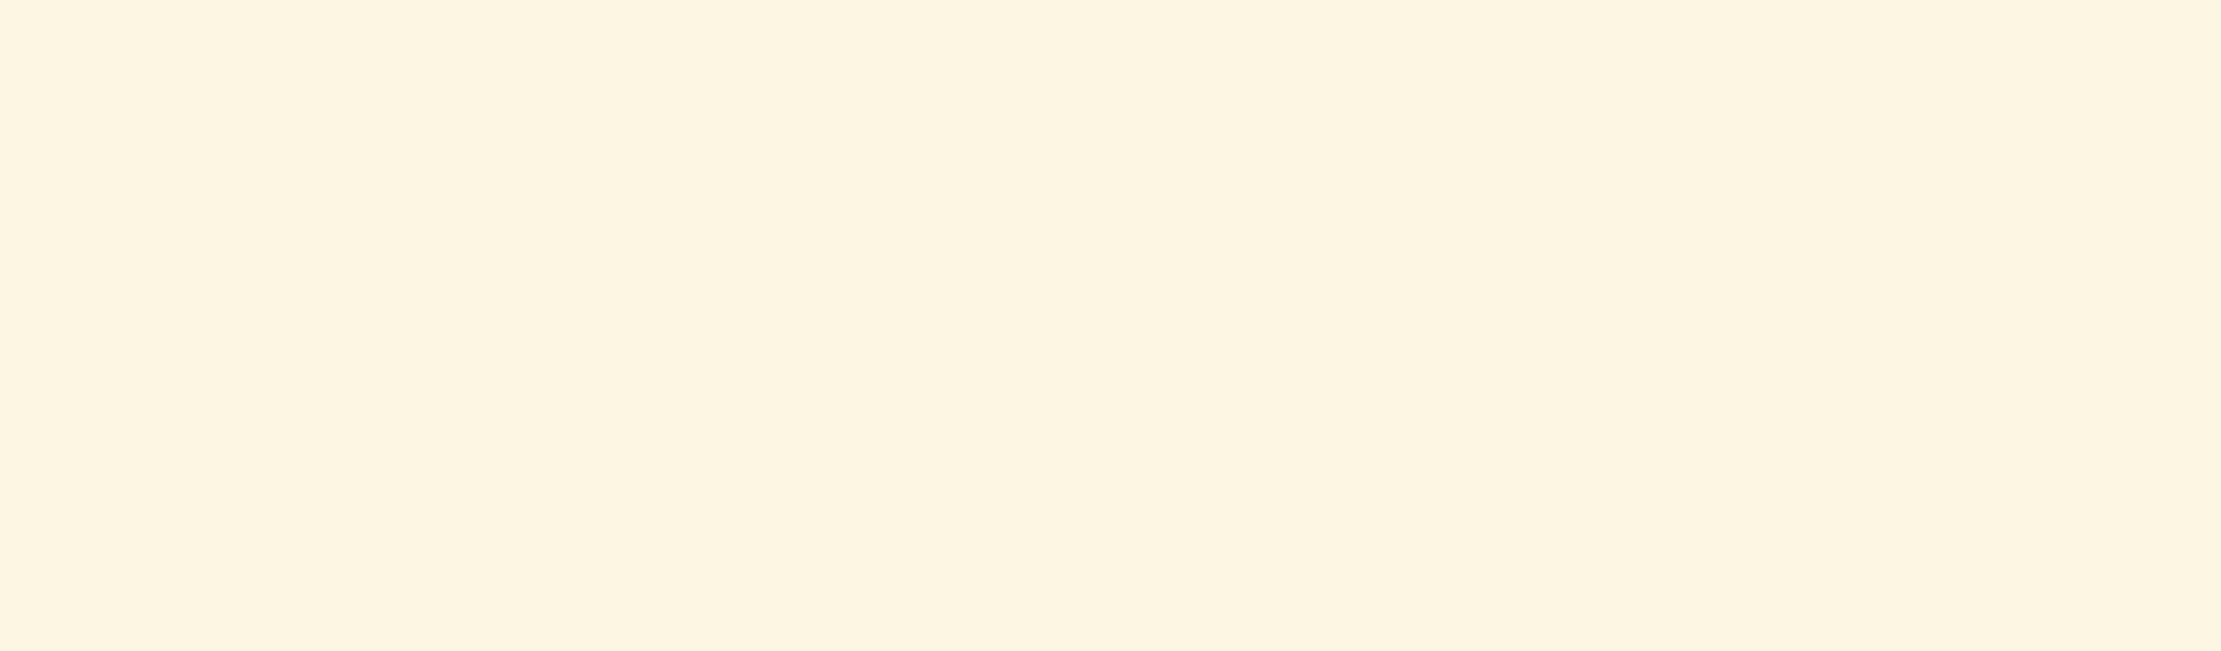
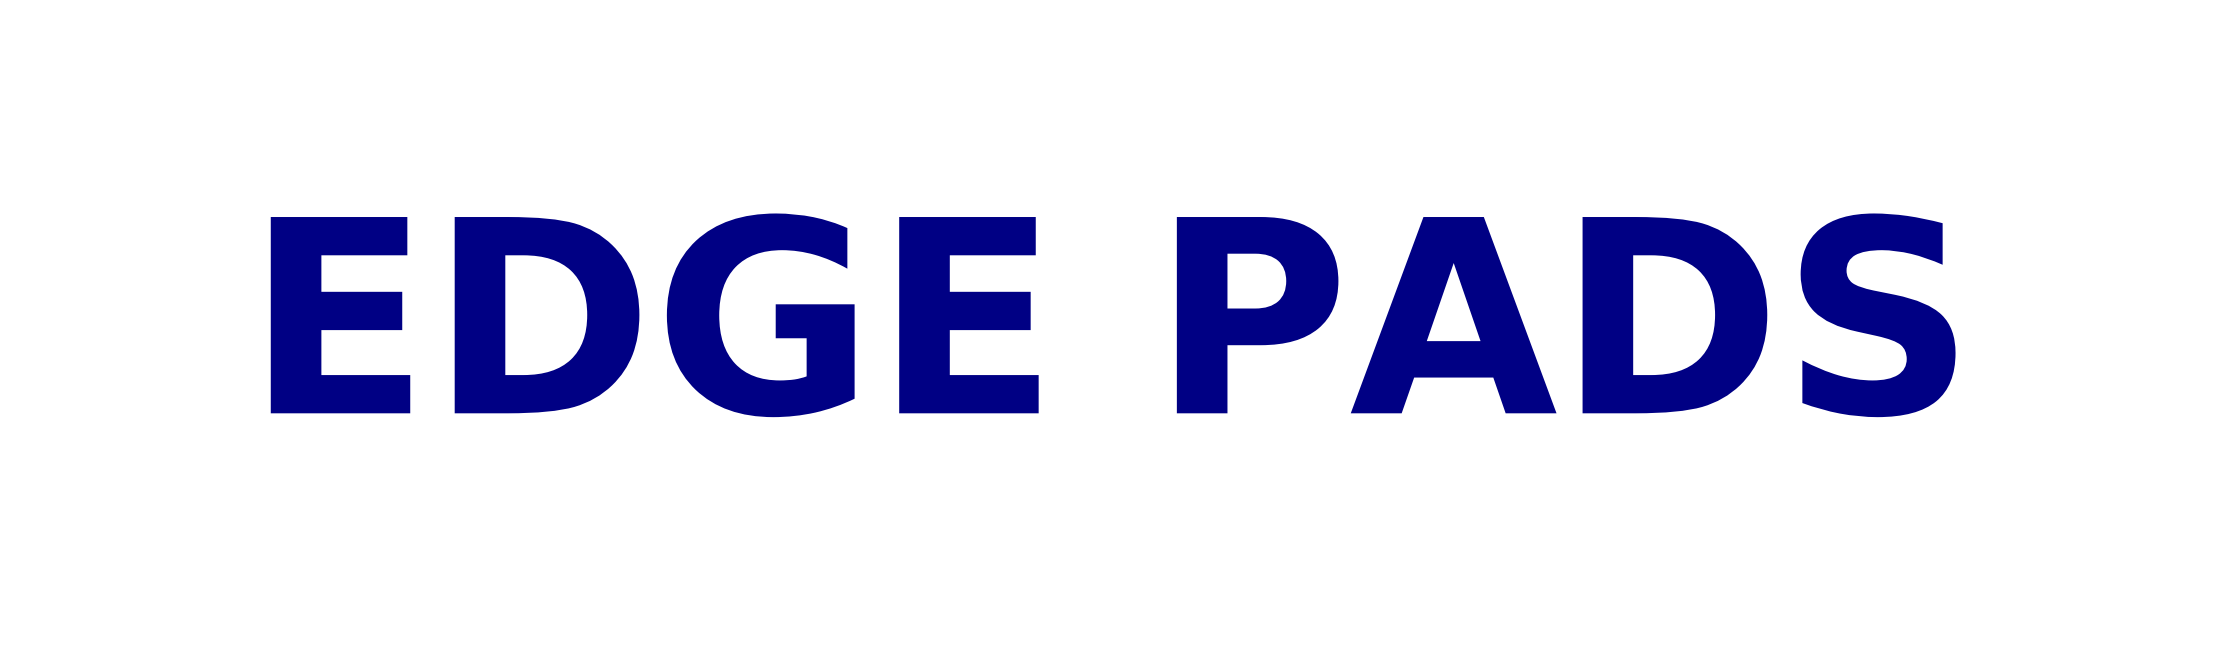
text: none -> EDGE PADS (1113, 315)

